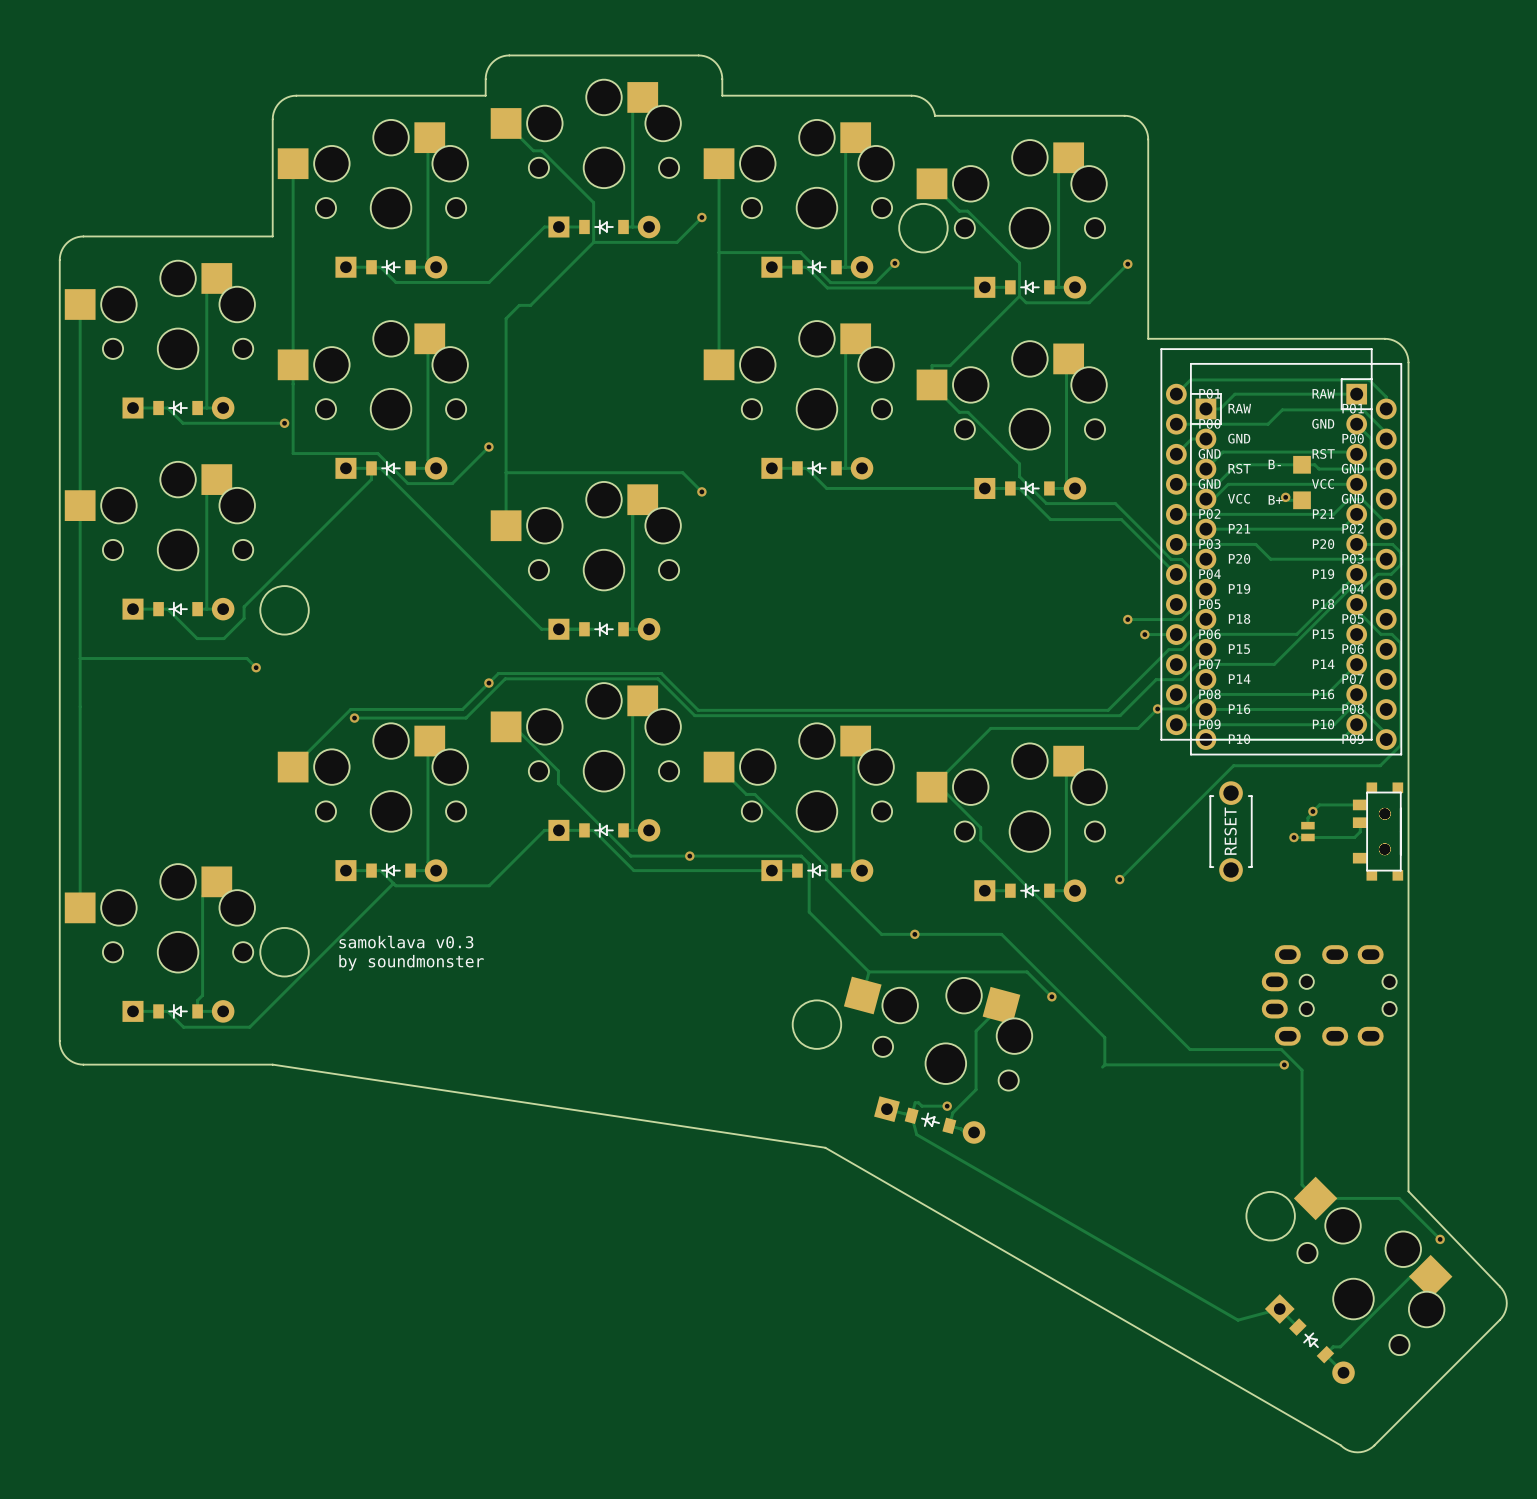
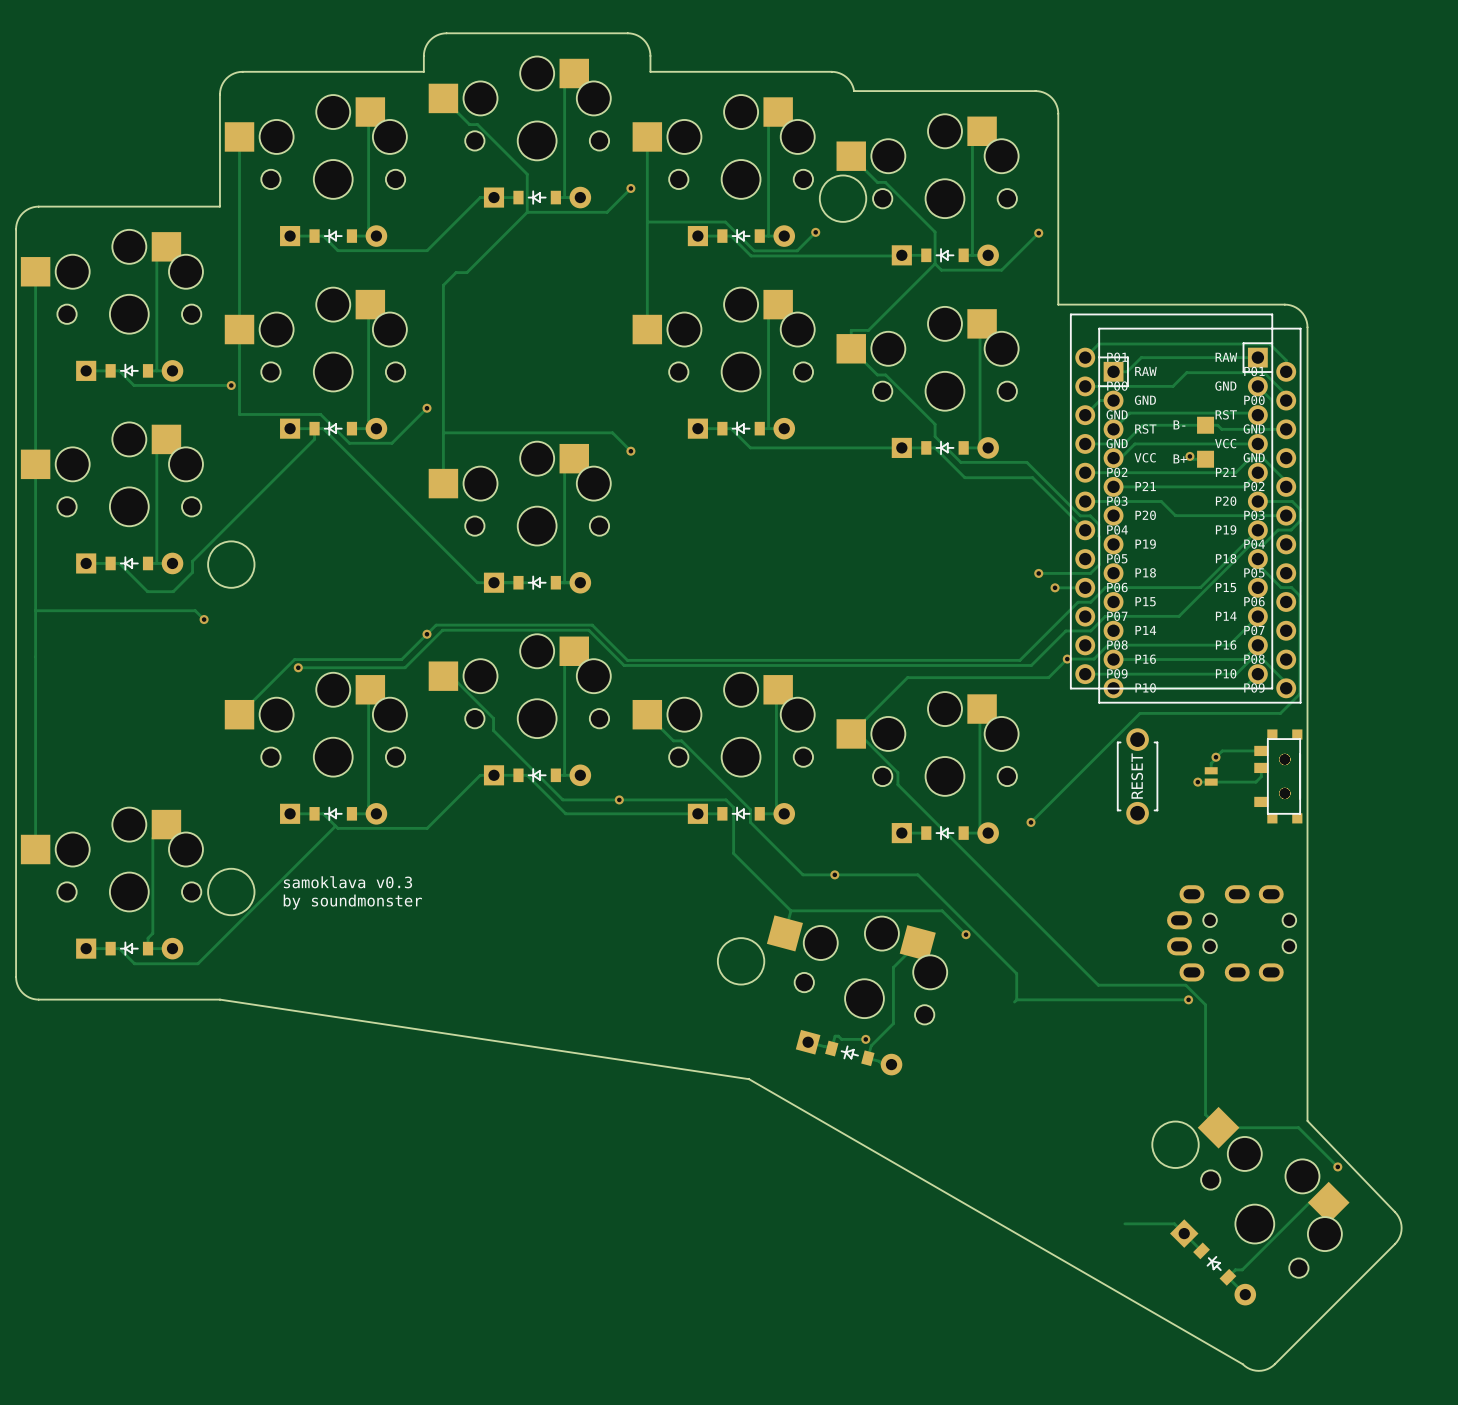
track: (911, 1115) (916, 1134) (1238, 1320) (1279, 1308) -> (1124, 1223) (1174, 1223) (1184, 1233)

